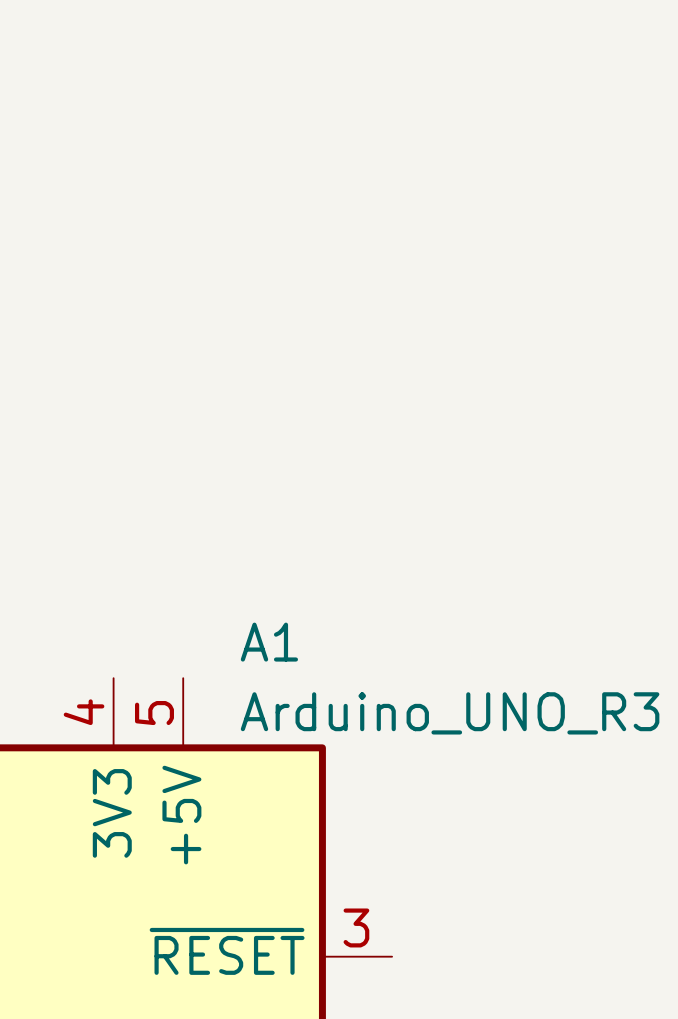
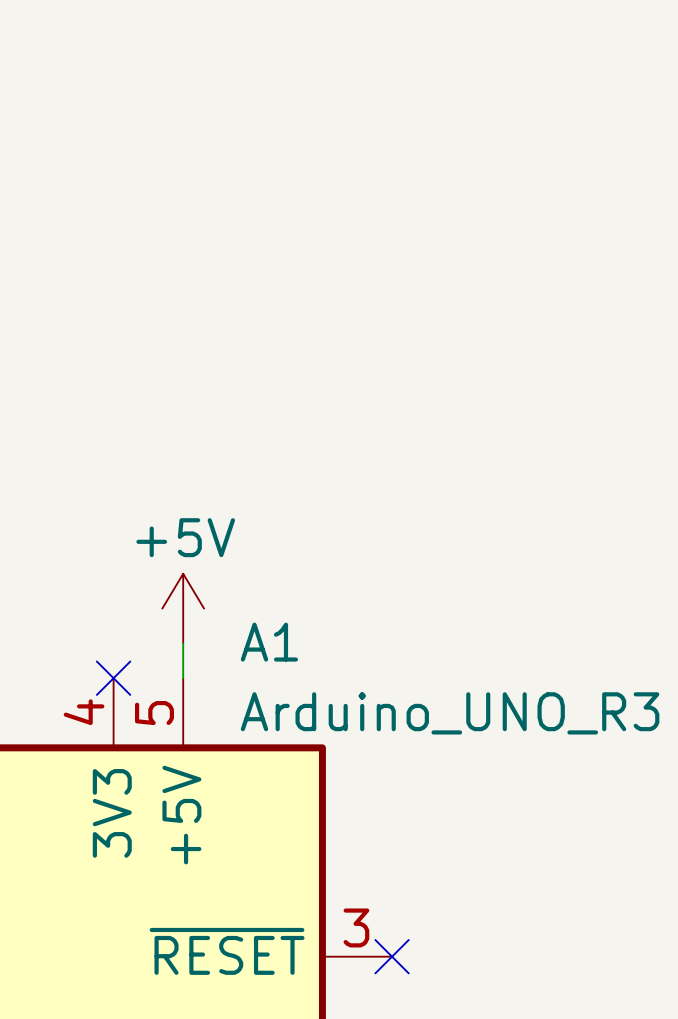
power symbol: none -> +5V (183, 608)
wire: none -> (183, 643) (183, 678)
no-connect mark: none -> (113, 678)
no-connect mark: none -> (392, 956)

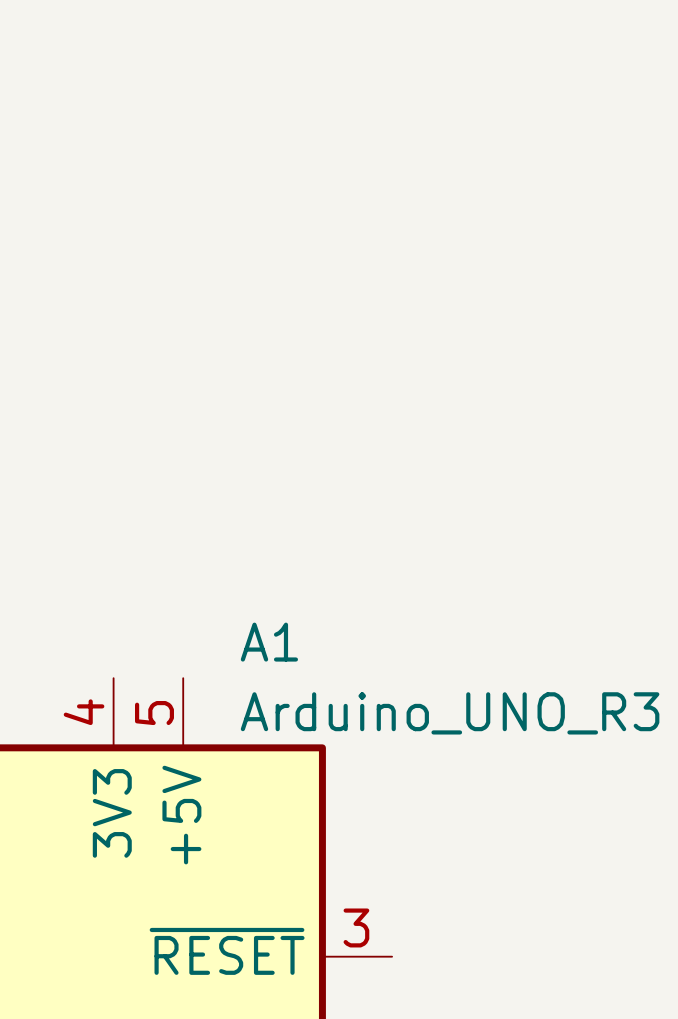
power symbol: +5V (183, 608) -> none
wire: (183, 643) (183, 678) -> none
no-connect mark: (113, 678) -> none
no-connect mark: (392, 956) -> none

